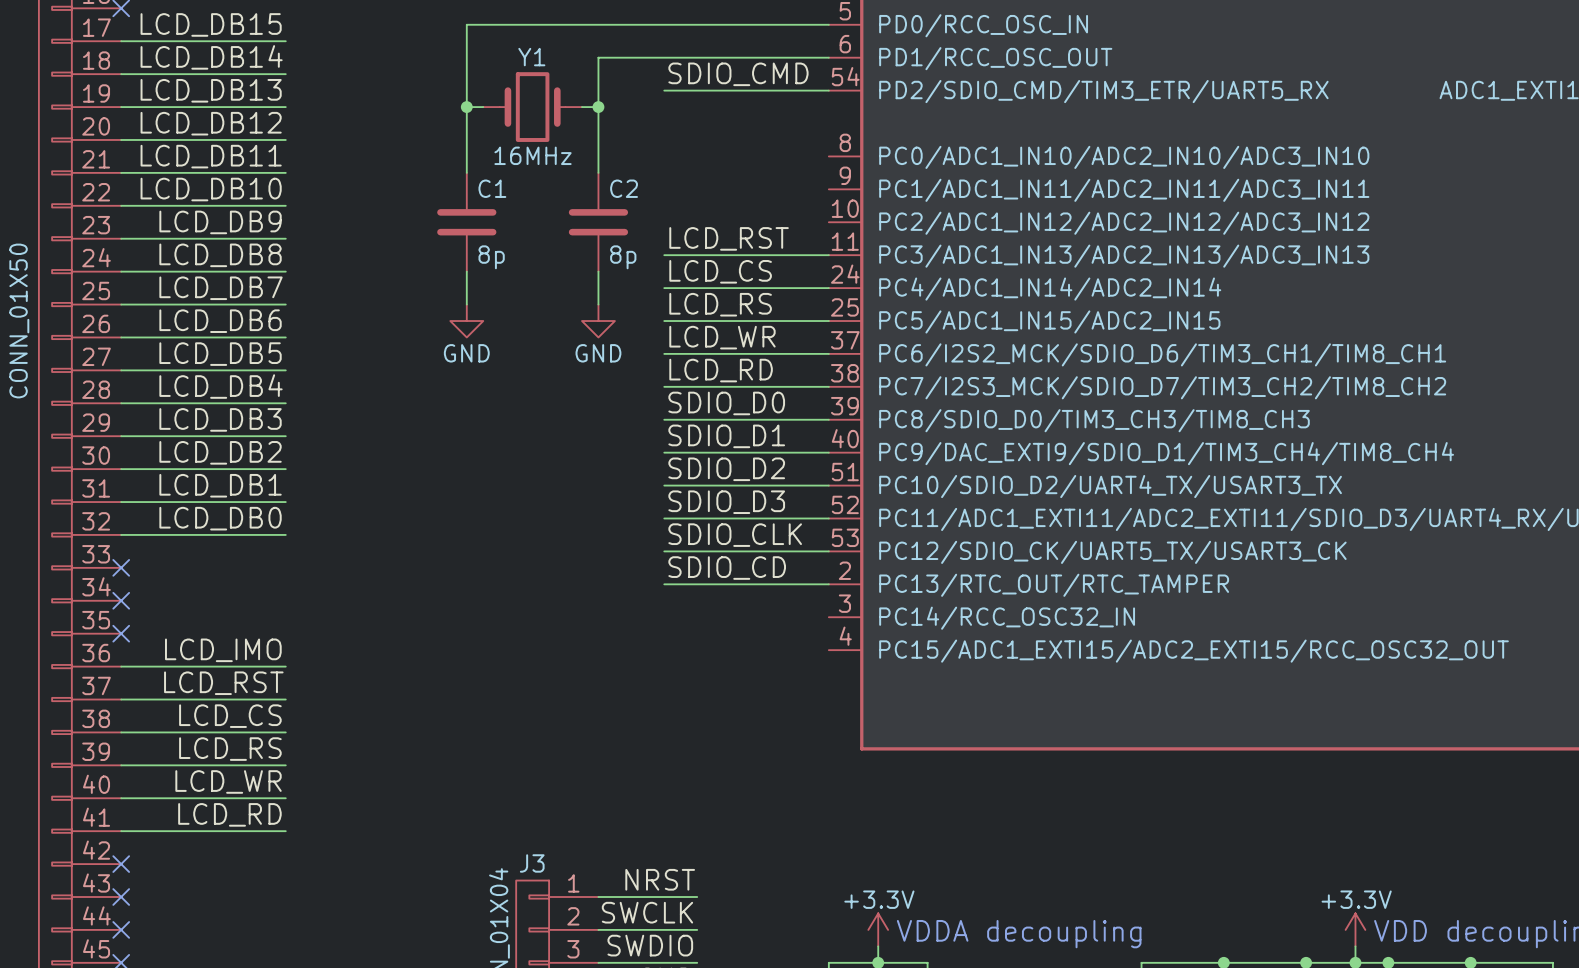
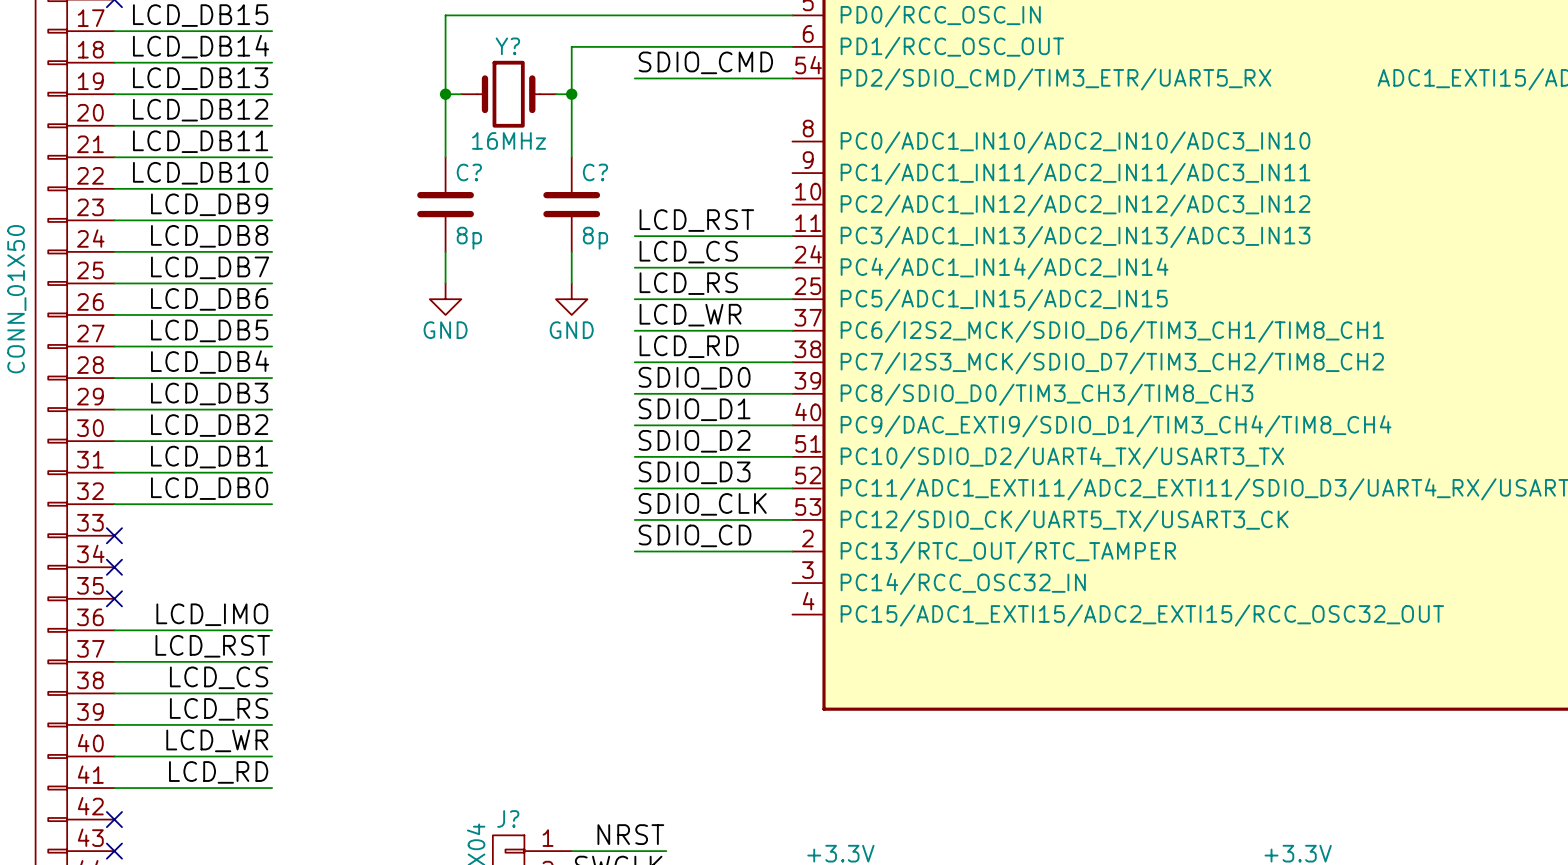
Y1 name: Y1 (531, 57) -> Y? (507, 46)
C1 name: C1 (492, 188) -> C? (469, 172)
C2 name: C2 (624, 188) -> C? (595, 172)
J3 name: J3 (532, 863) -> J? (508, 818)

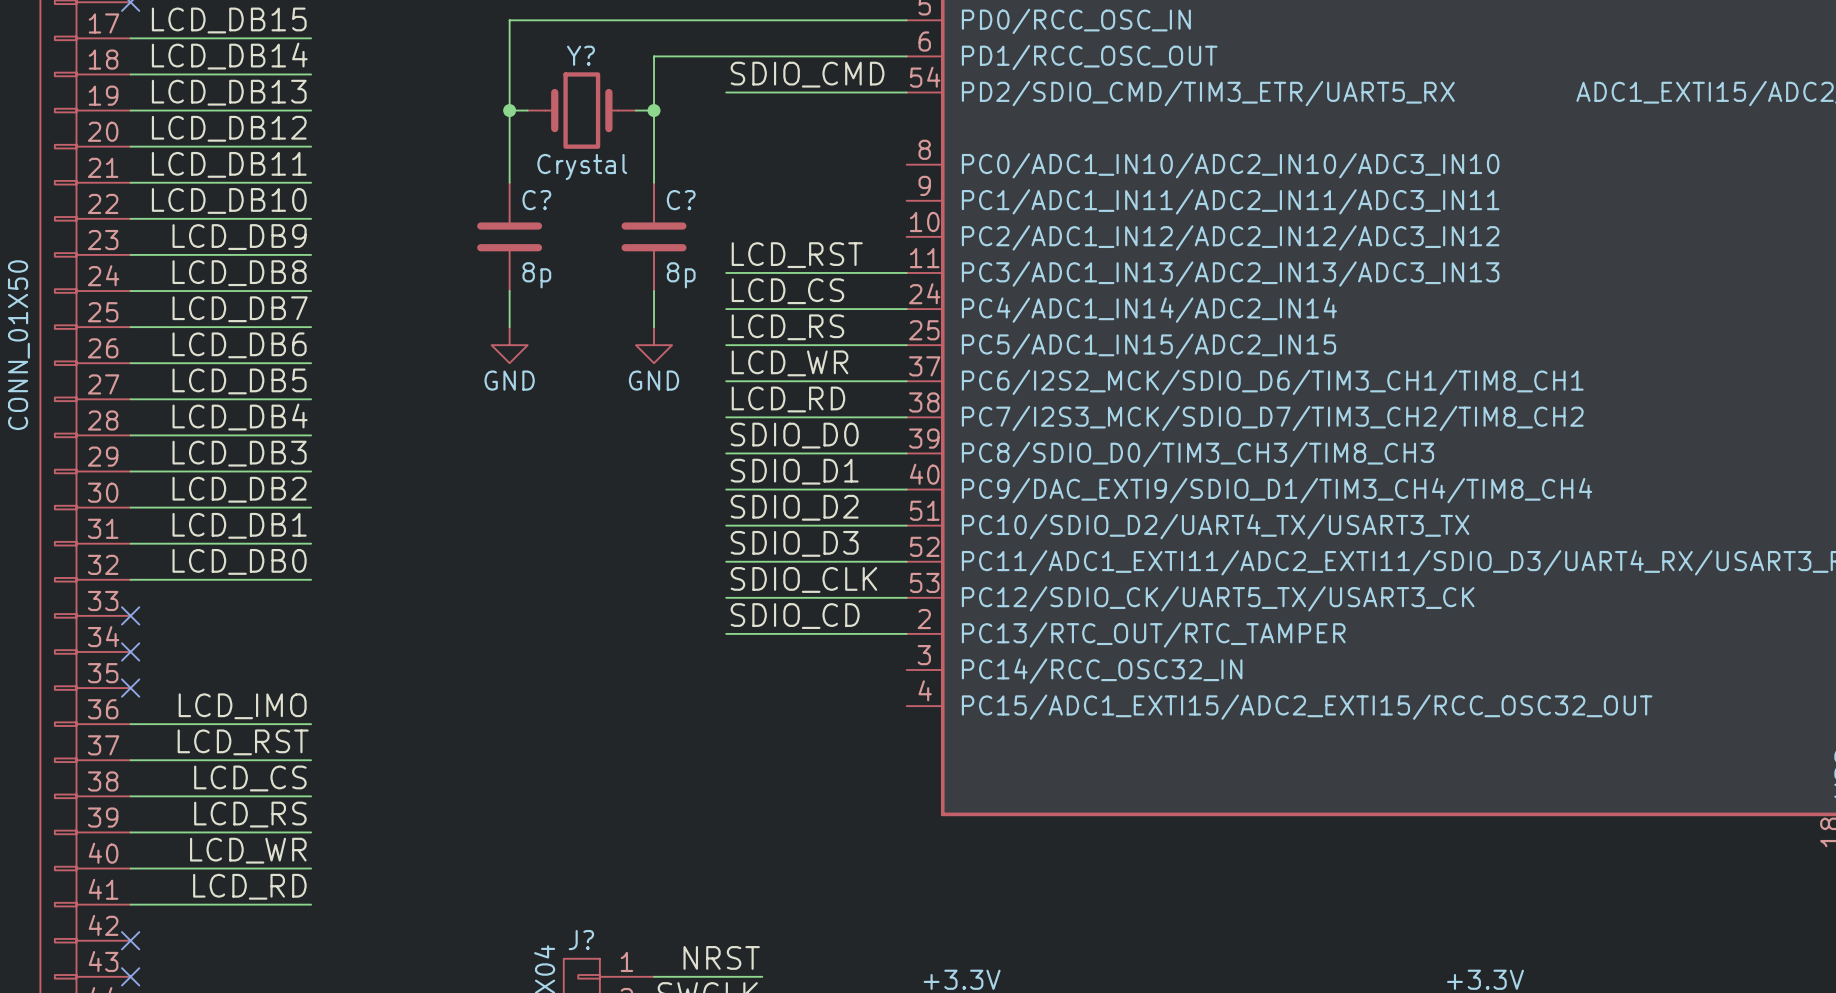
Y? value: 16MHz (509, 140) -> Crystal (582, 167)

